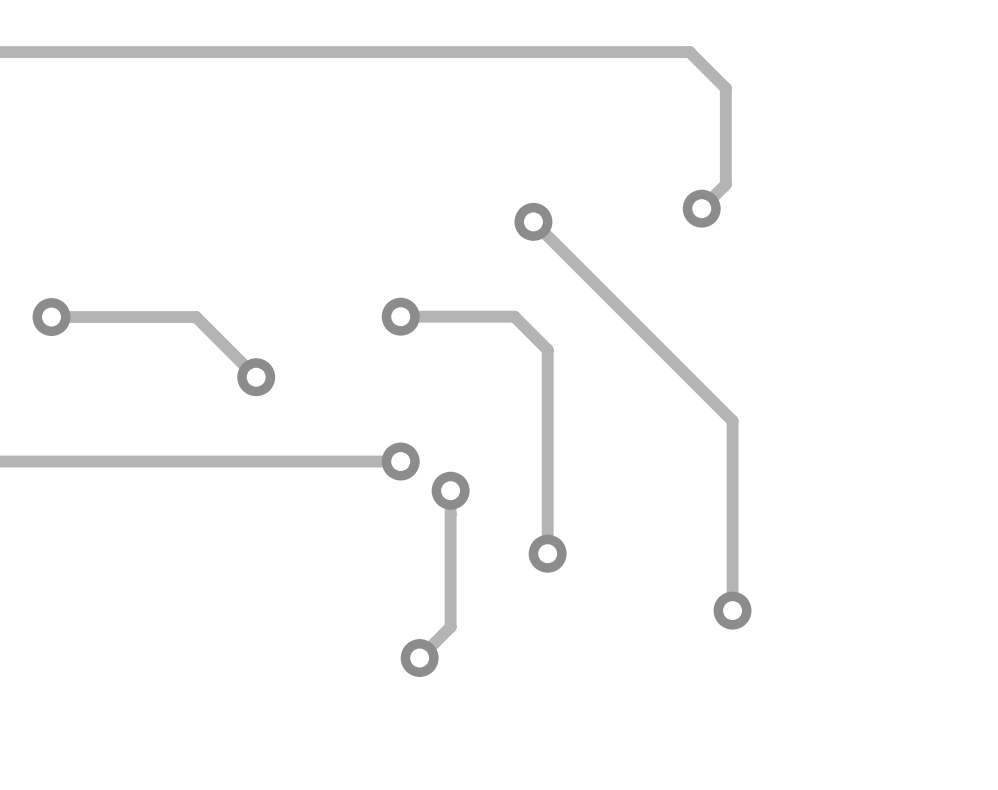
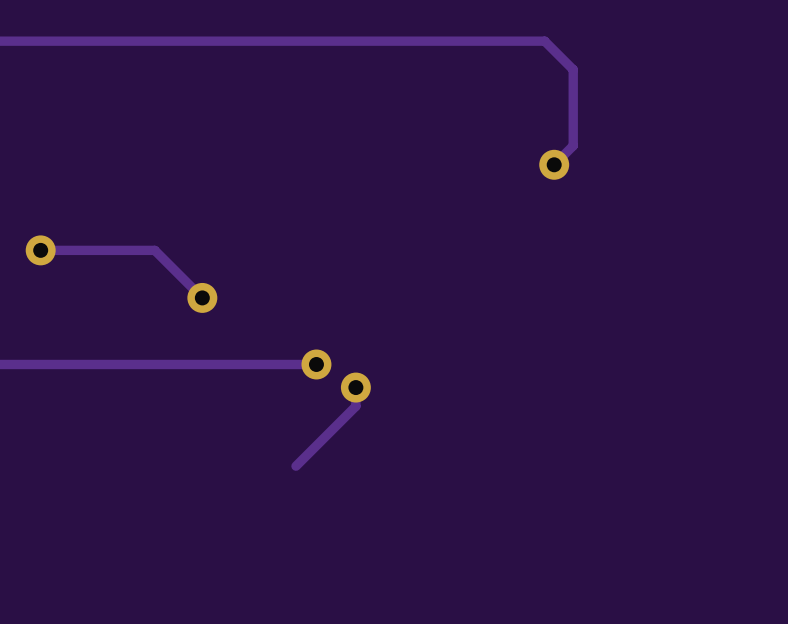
track: (533, 221) (732, 420) (732, 610) -> none
via: (533, 221) -> none
track: (400, 316) (514, 316) (547, 349) (547, 553) -> none
via: (400, 316) -> none
track: (450, 514) (450, 627) (419, 658) -> (355, 406) (295, 466)
via: (547, 553) -> none
via: (732, 610) -> none
via: (419, 658) -> none

